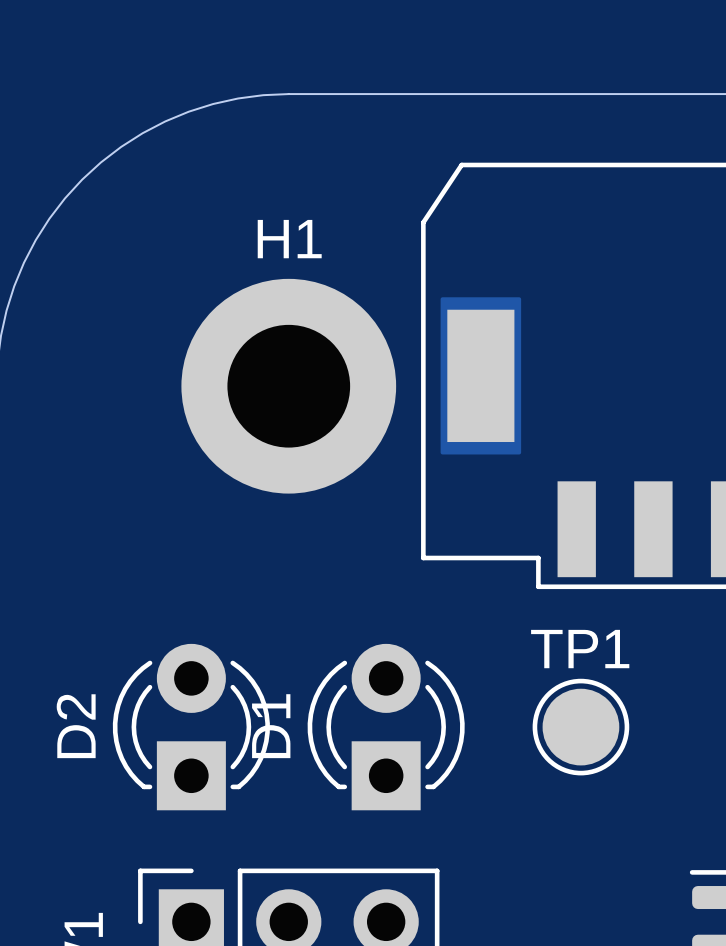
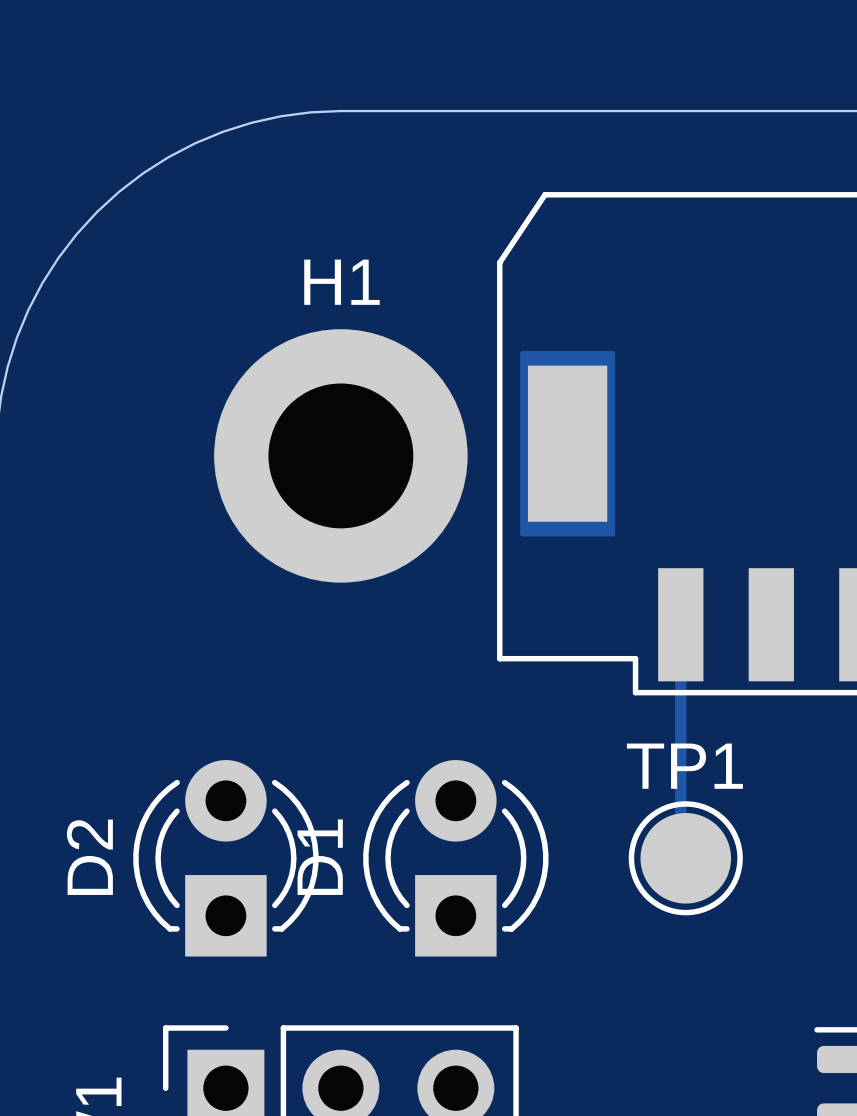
track: none -> (680, 624) (680, 853) (685, 858)

